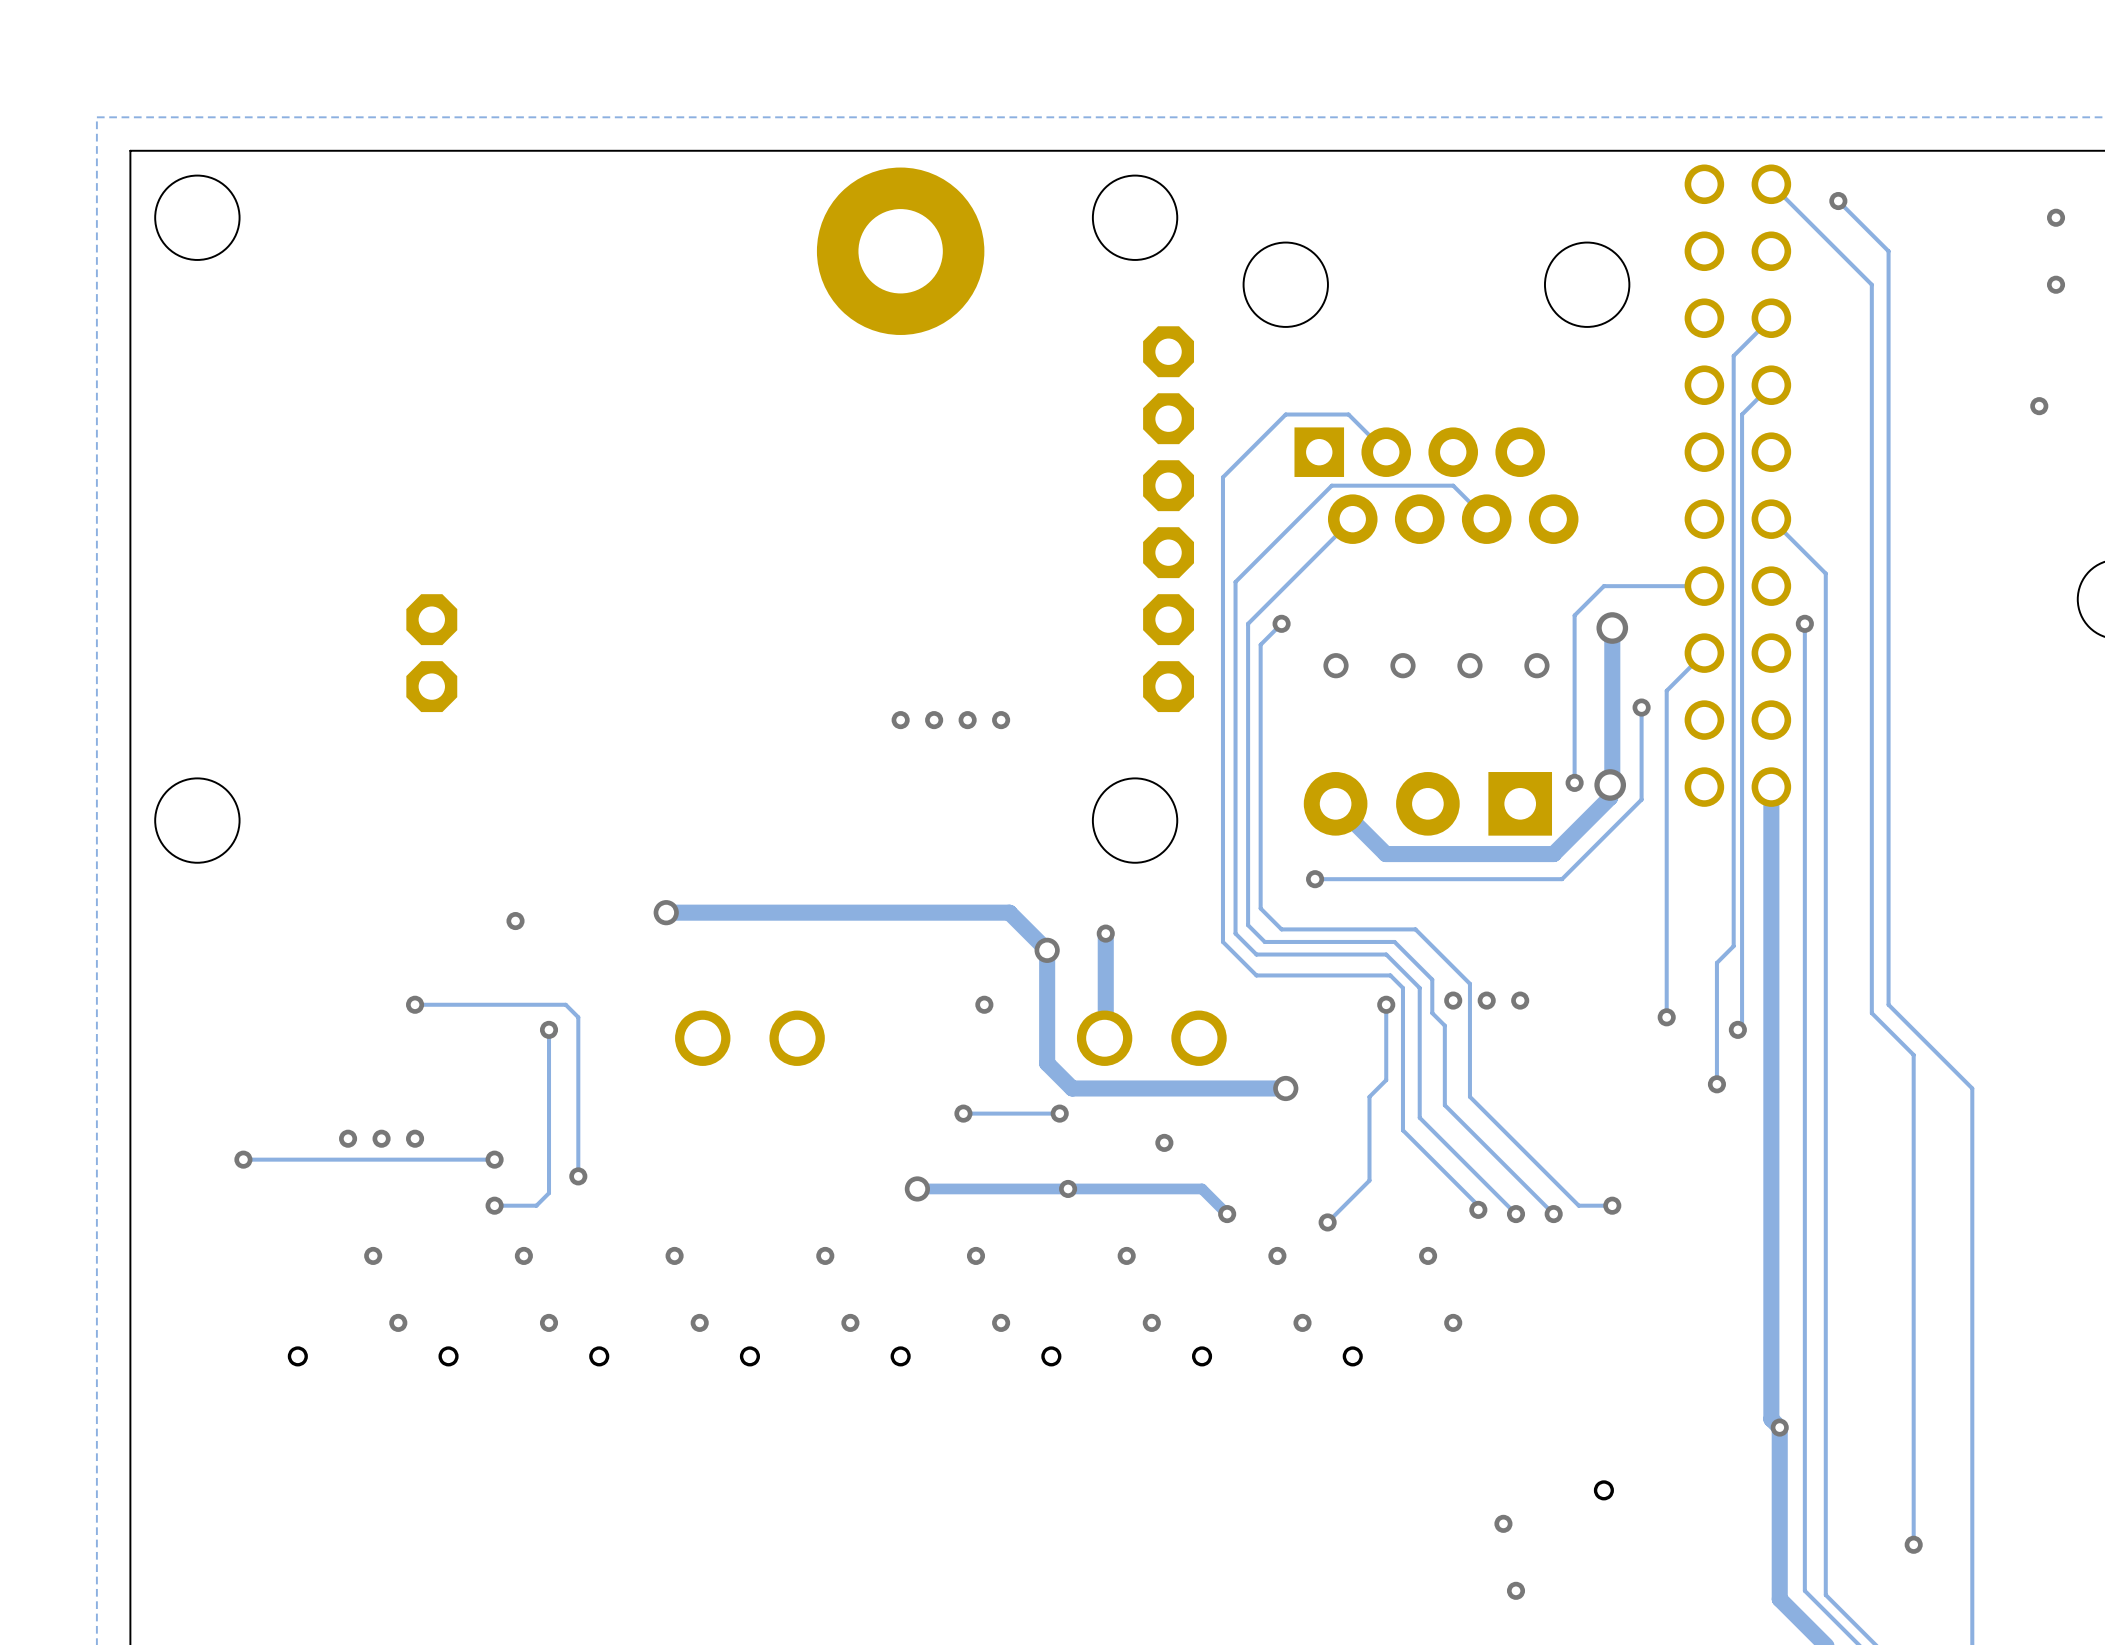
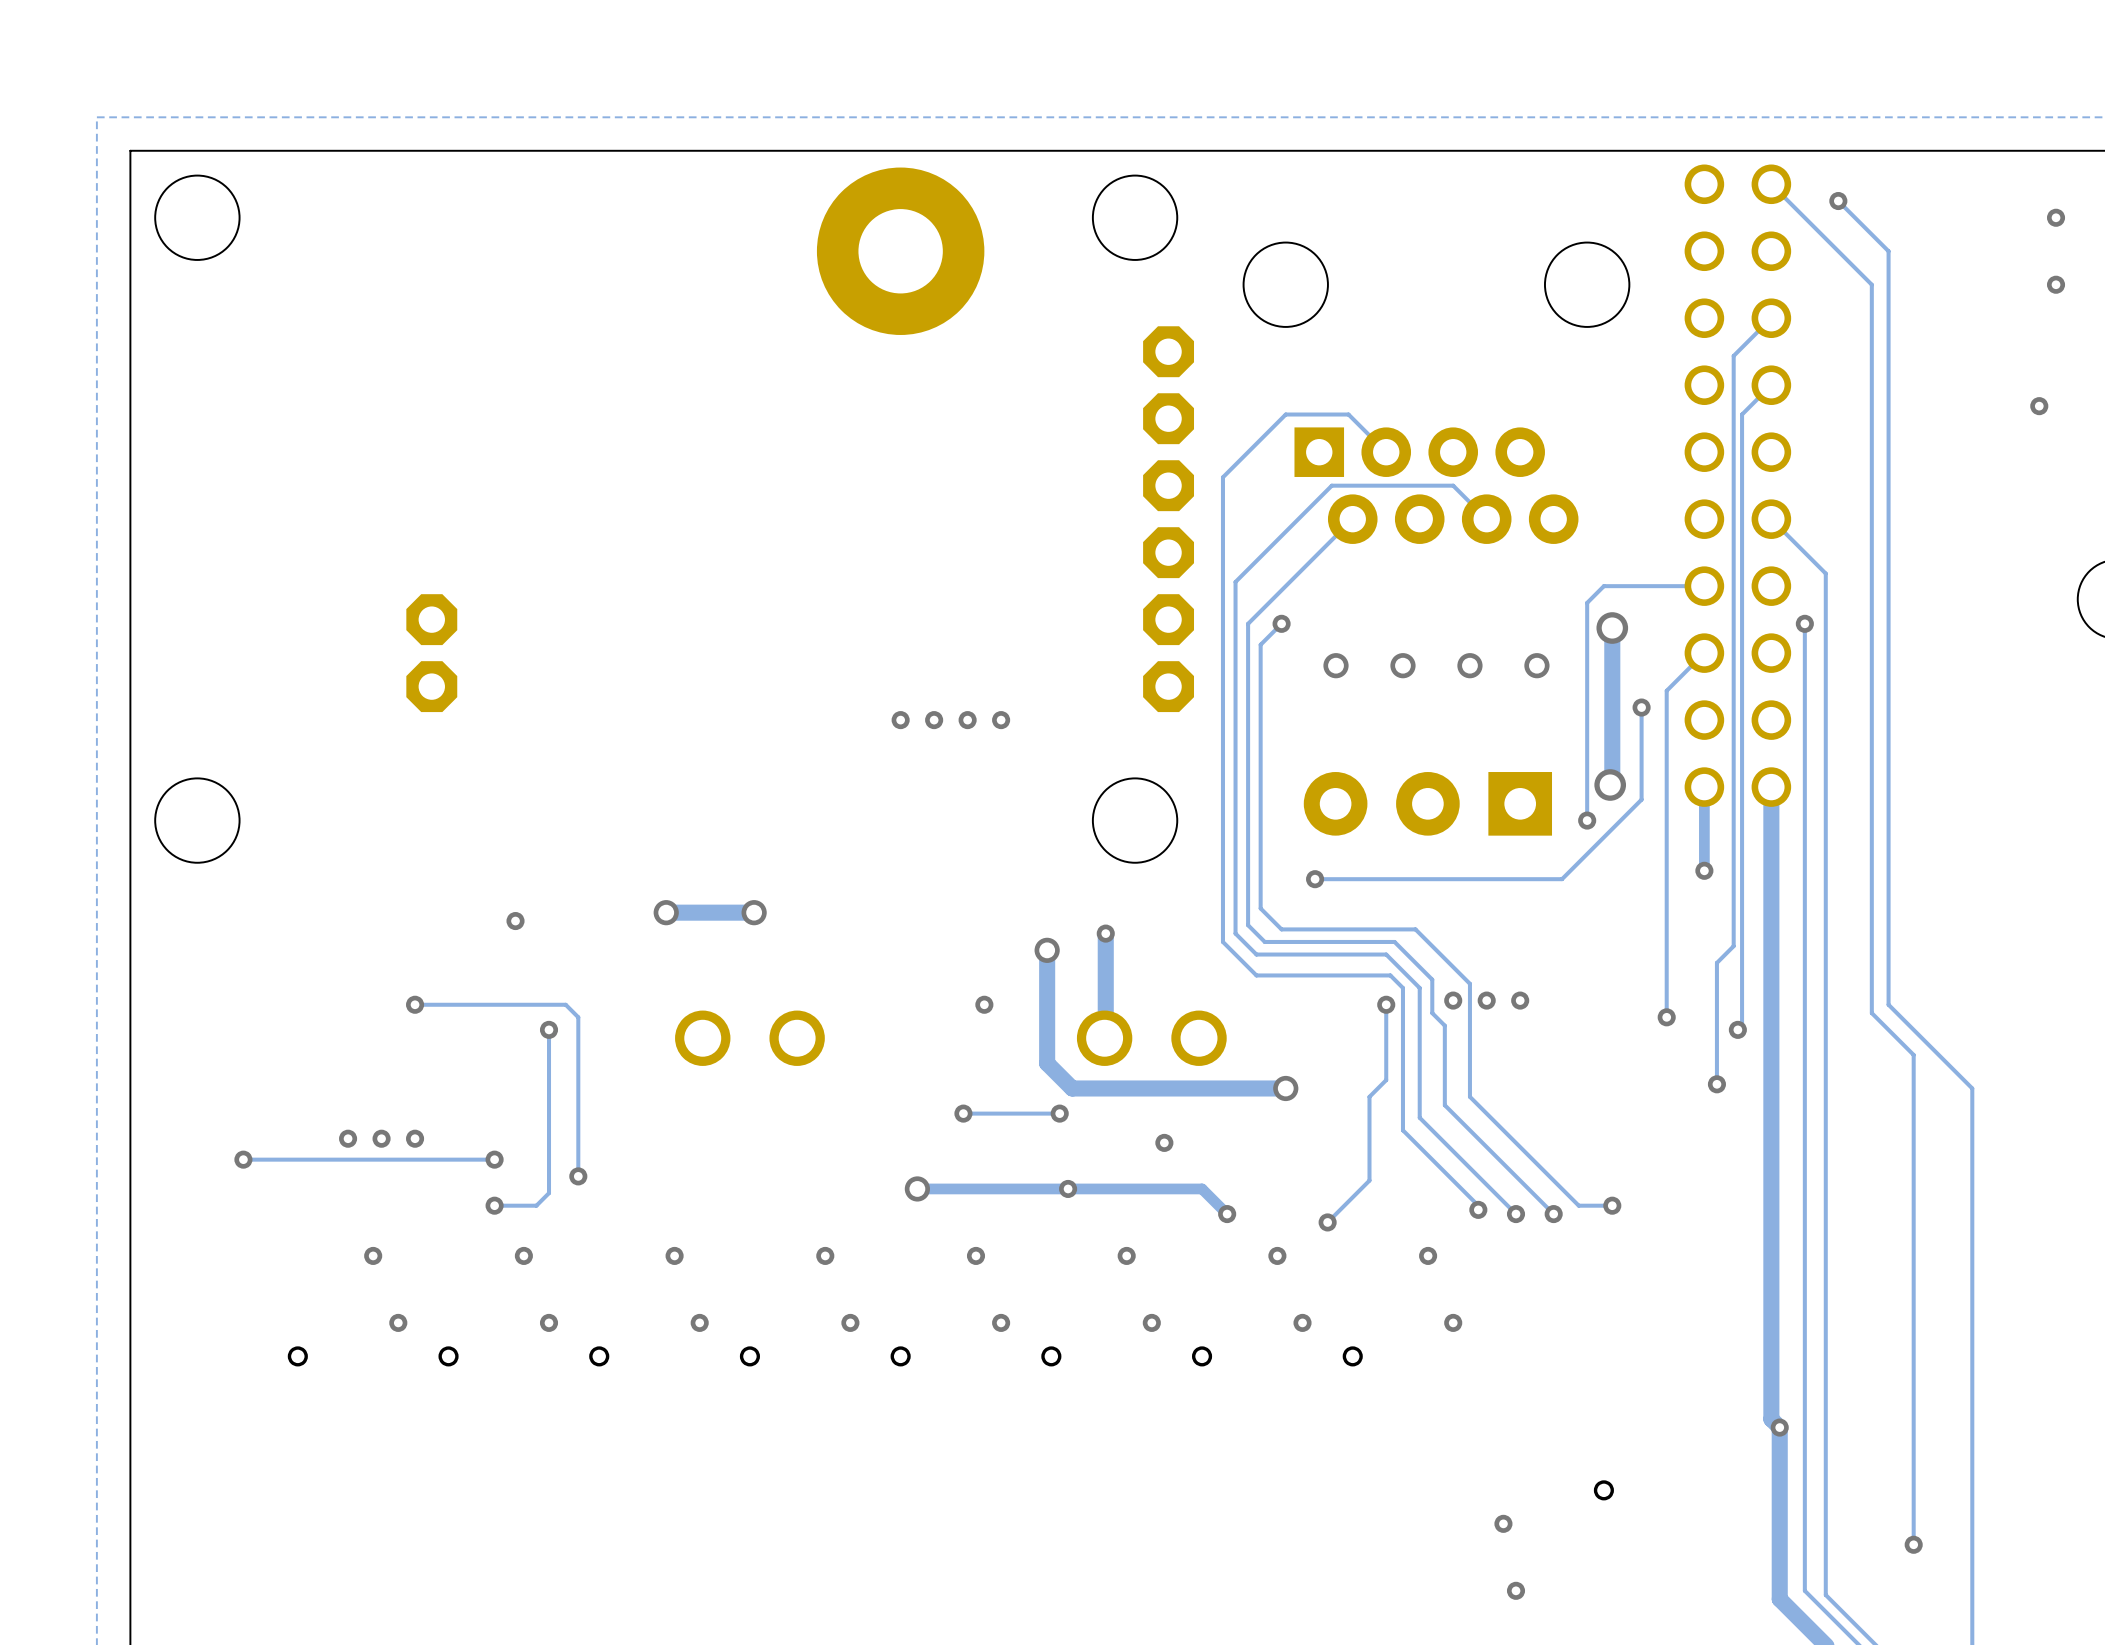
track: (1587, 602) (1574, 615) (1574, 782) -> (1587, 602) (1587, 820)
via position: (1574, 782) -> (1587, 820)
track: (1610, 784) (1610, 797) (1553, 854) (1385, 854) (1335, 803) -> none
track: none -> (1704, 787) (1704, 870)
via: none -> (1704, 870)
track: (754, 912) (1009, 912) (1047, 950) -> none
via: none -> (754, 912)

